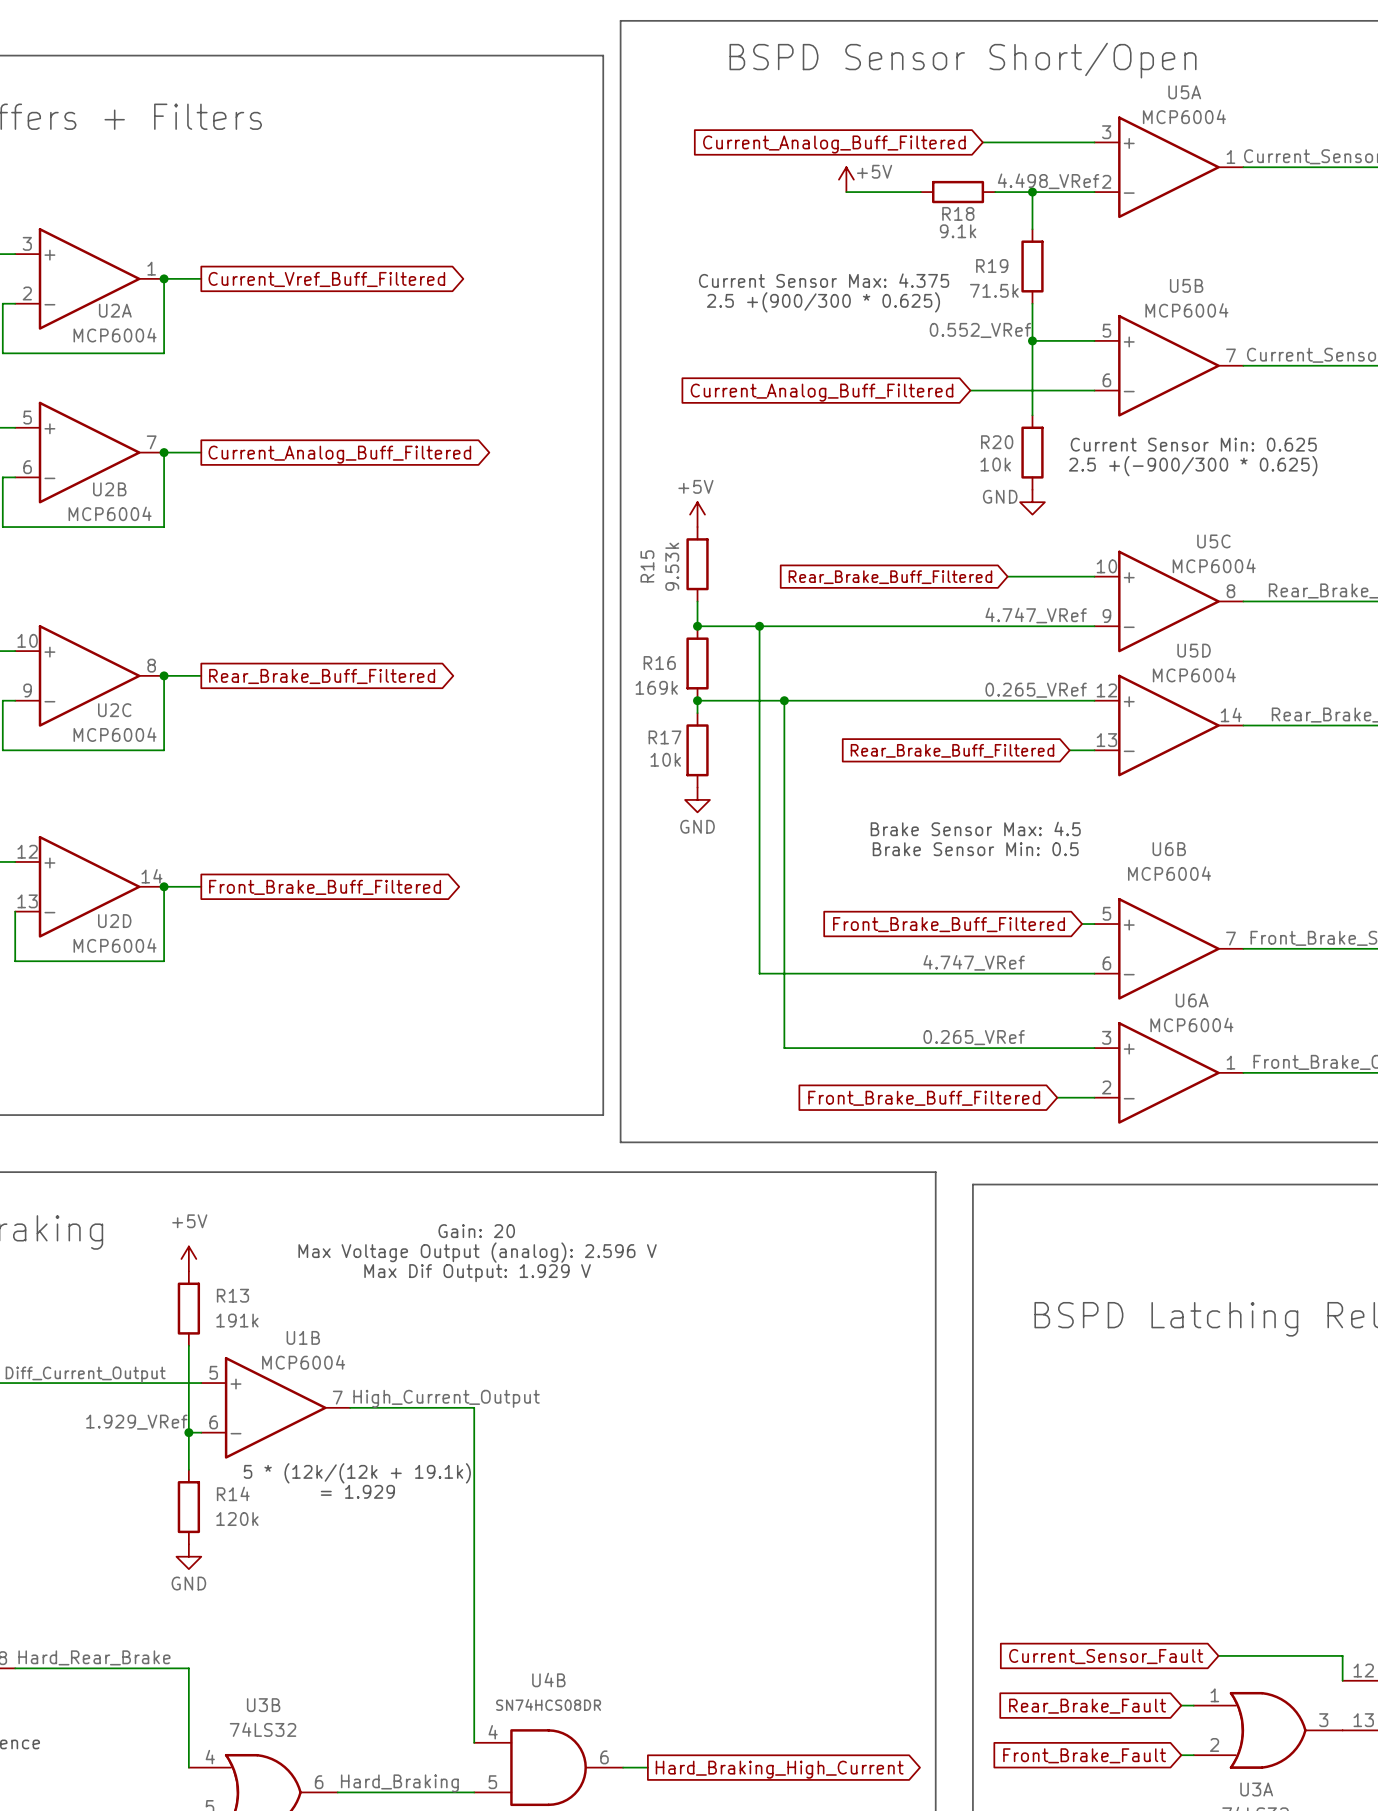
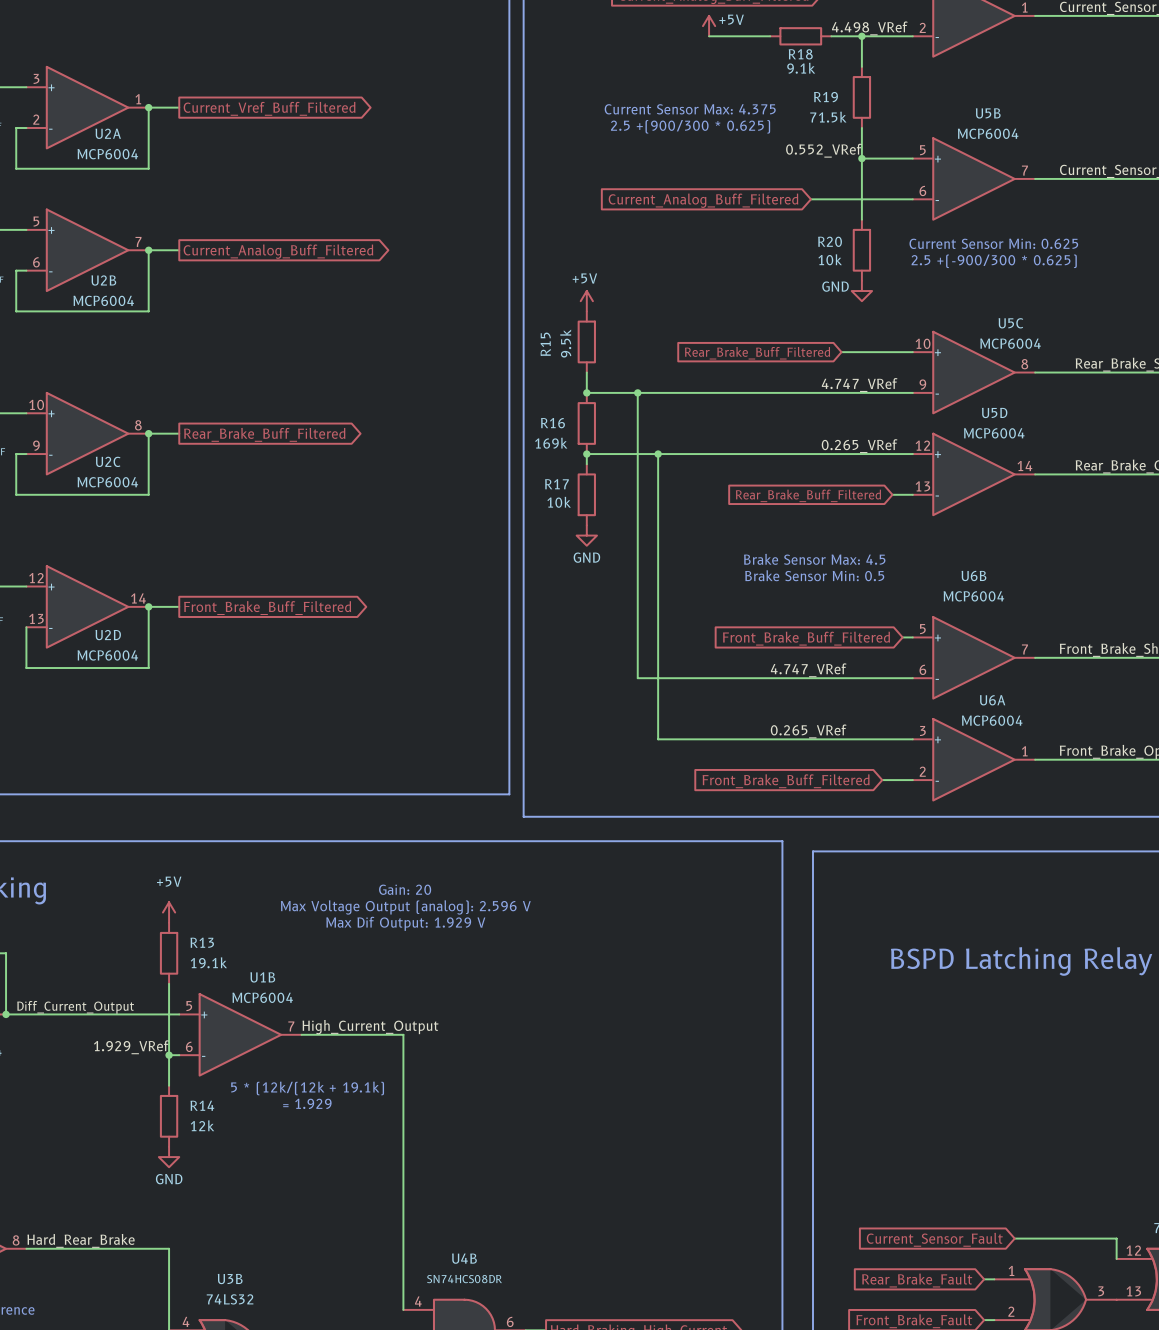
R15 value: 9.53k (672, 566) -> 9.5k (565, 343)
R13 value: 191k (237, 1320) -> 19.1k (208, 962)
R14 value: 120k (237, 1519) -> 12k (202, 1125)

